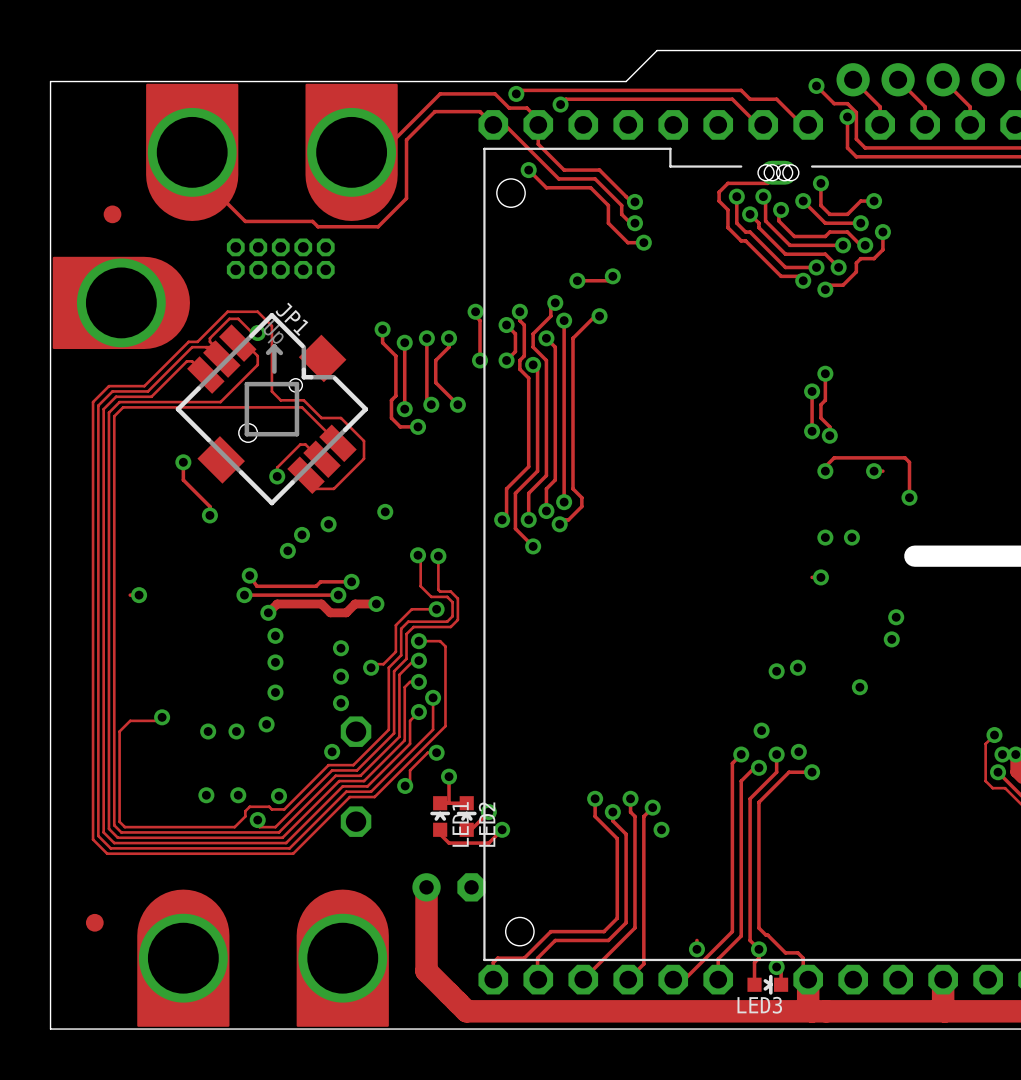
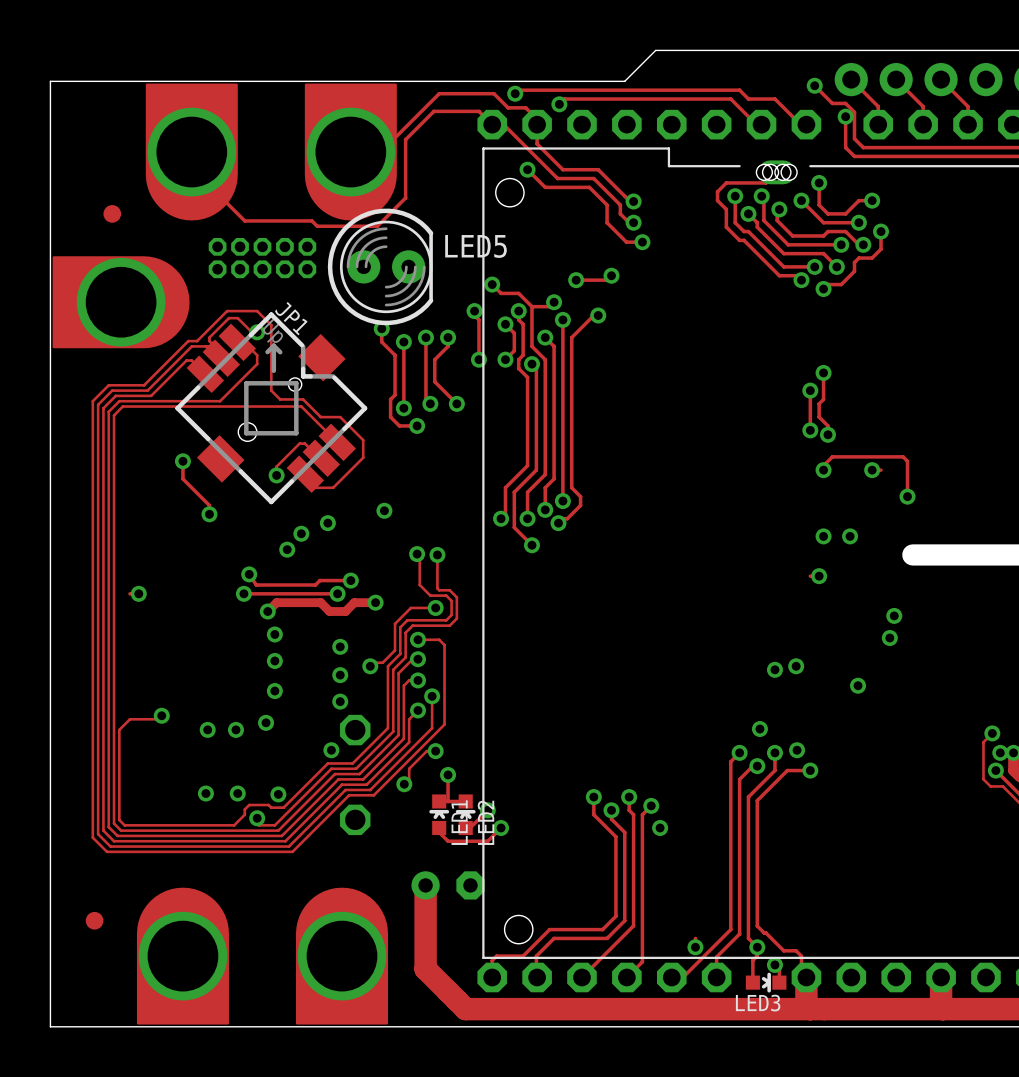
part position: (280, 258) -> (262, 258)
LED5: none -> (380, 266)
track: none -> (492, 284) (501, 293) (518, 293) (531, 306)
via: none -> (492, 284)
track: none -> (531, 306) (549, 306)
track: (550, 307) (550, 316) (533, 333) -> (531, 306) (531, 333)

